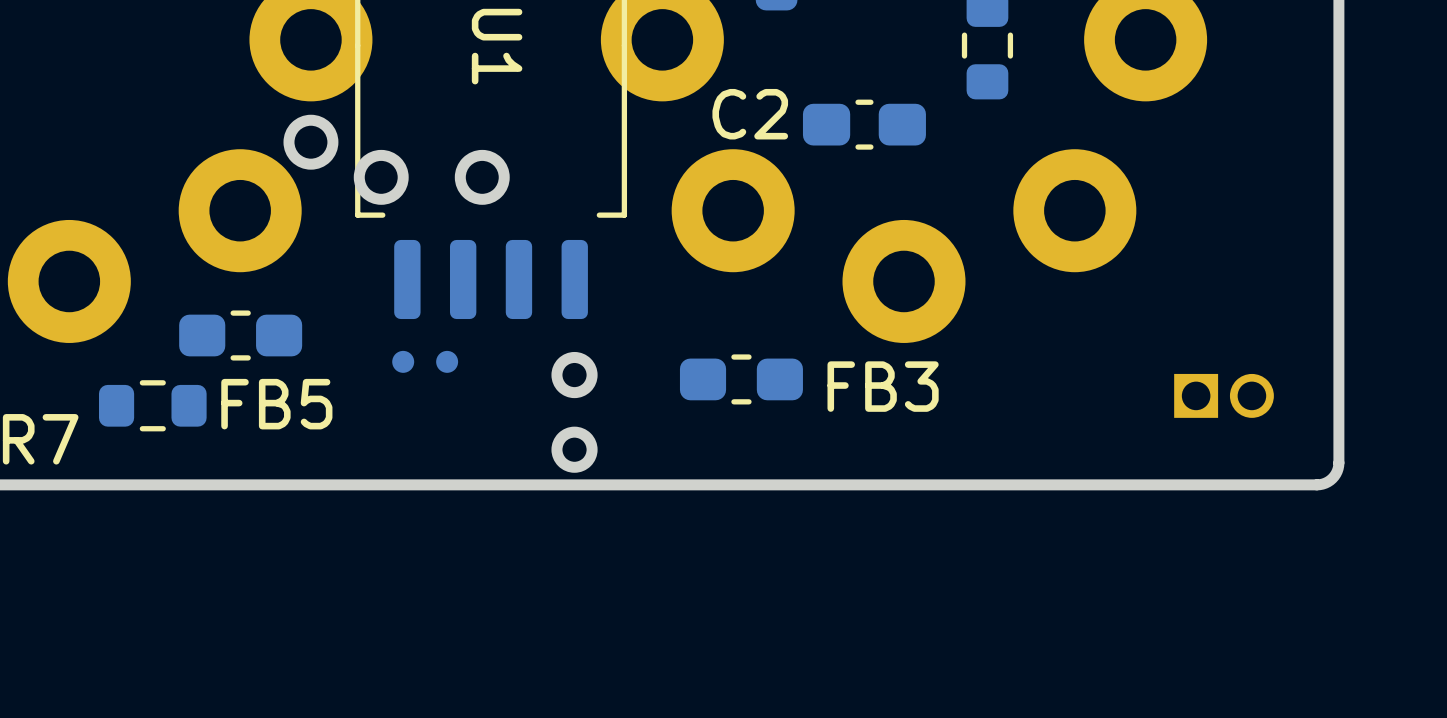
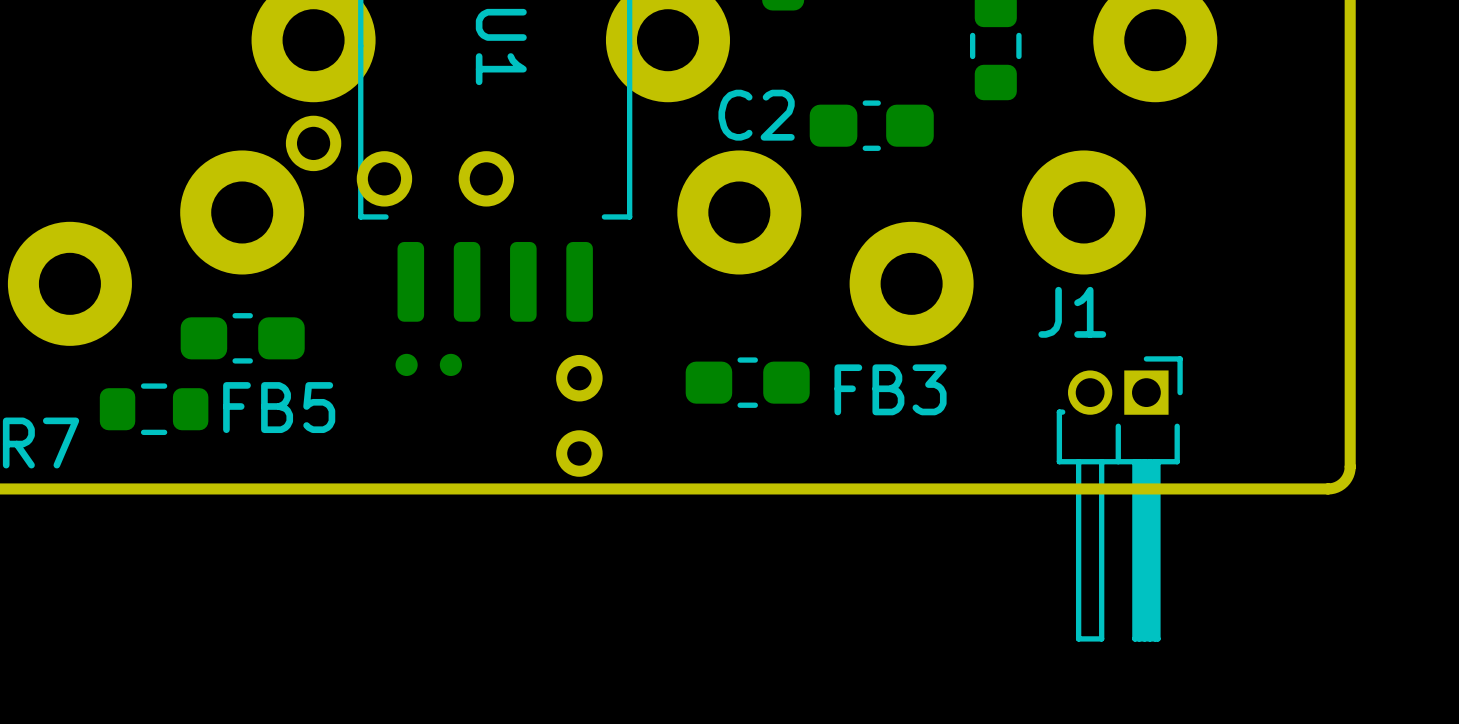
J1 side: top (1224, 395) -> bottom (1119, 498)

